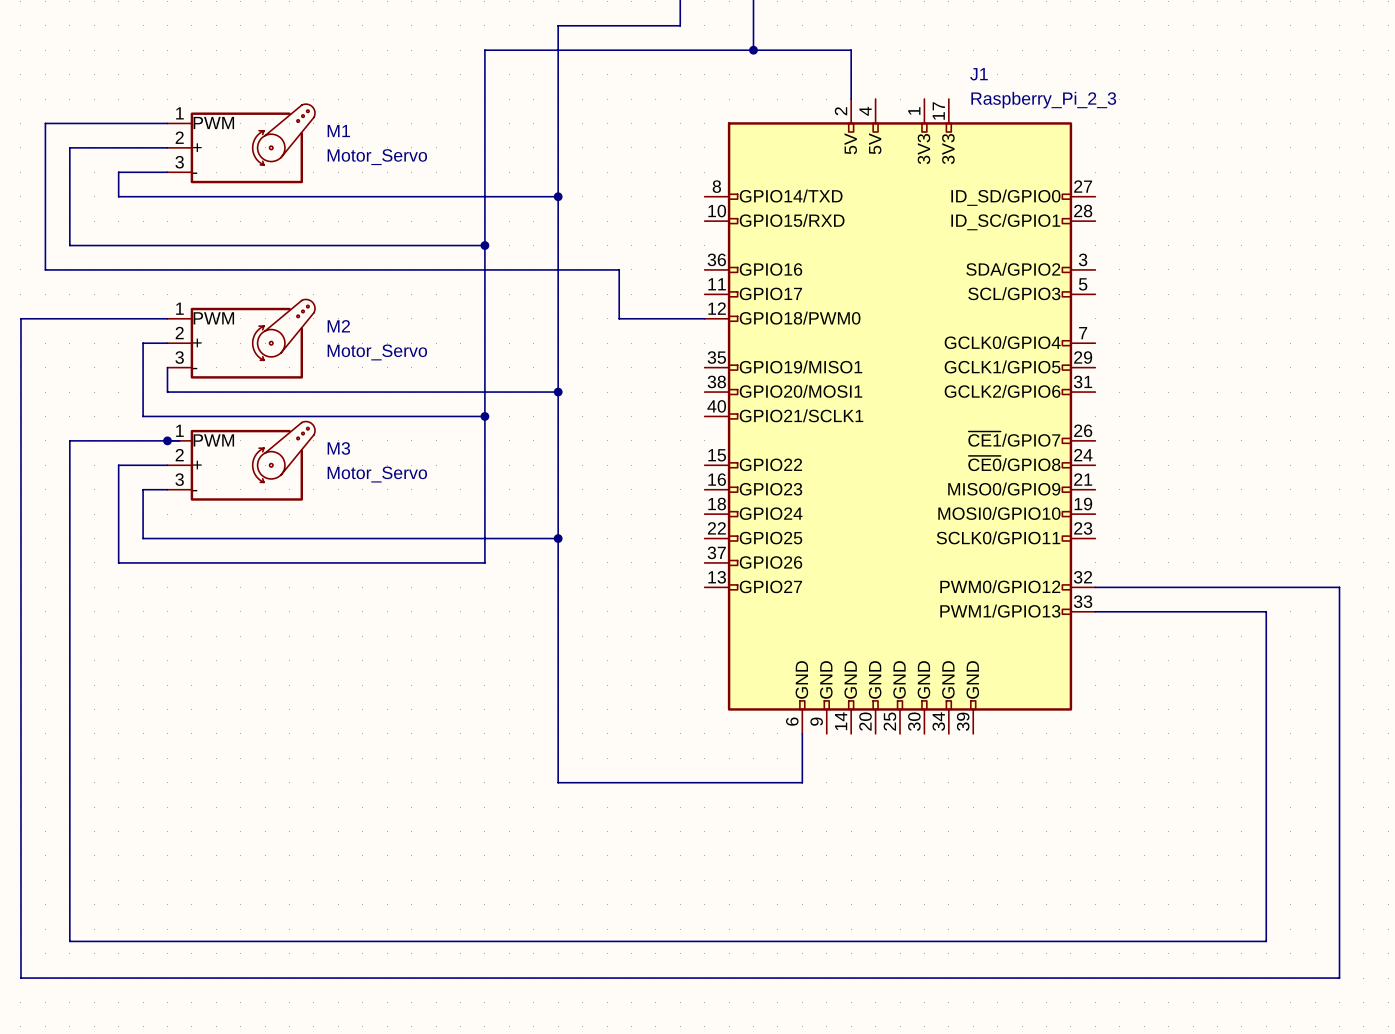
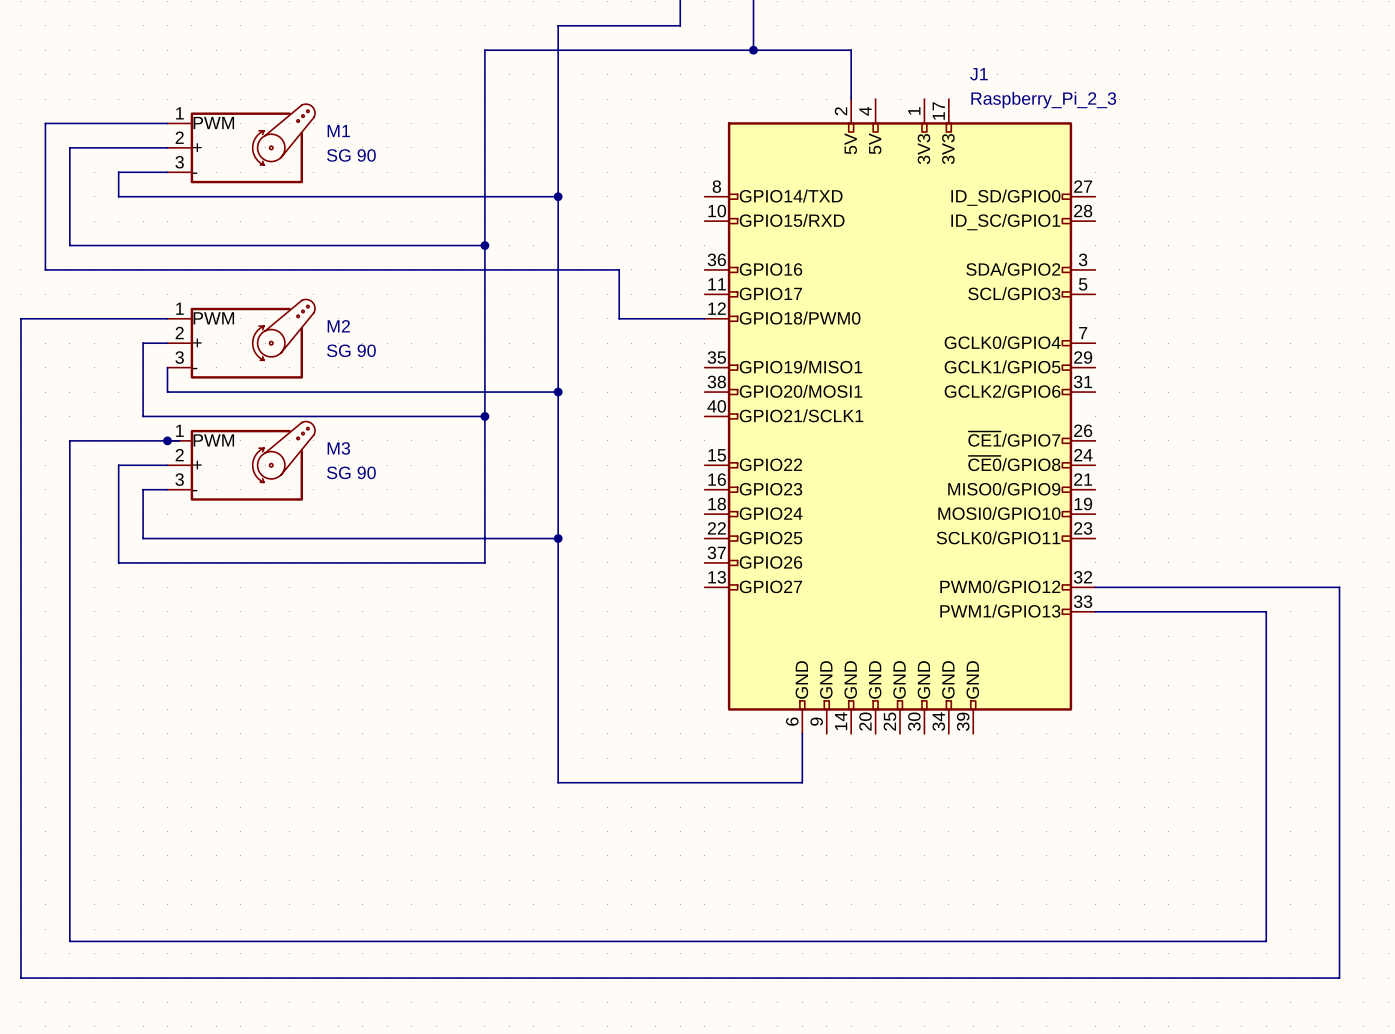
M1 value: Motor_Servo (377, 157) -> SG 90 (351, 155)
M2 value: Motor_Servo (377, 352) -> SG 90 (351, 350)
M3 value: Motor_Servo (377, 474) -> SG 90 (351, 472)

